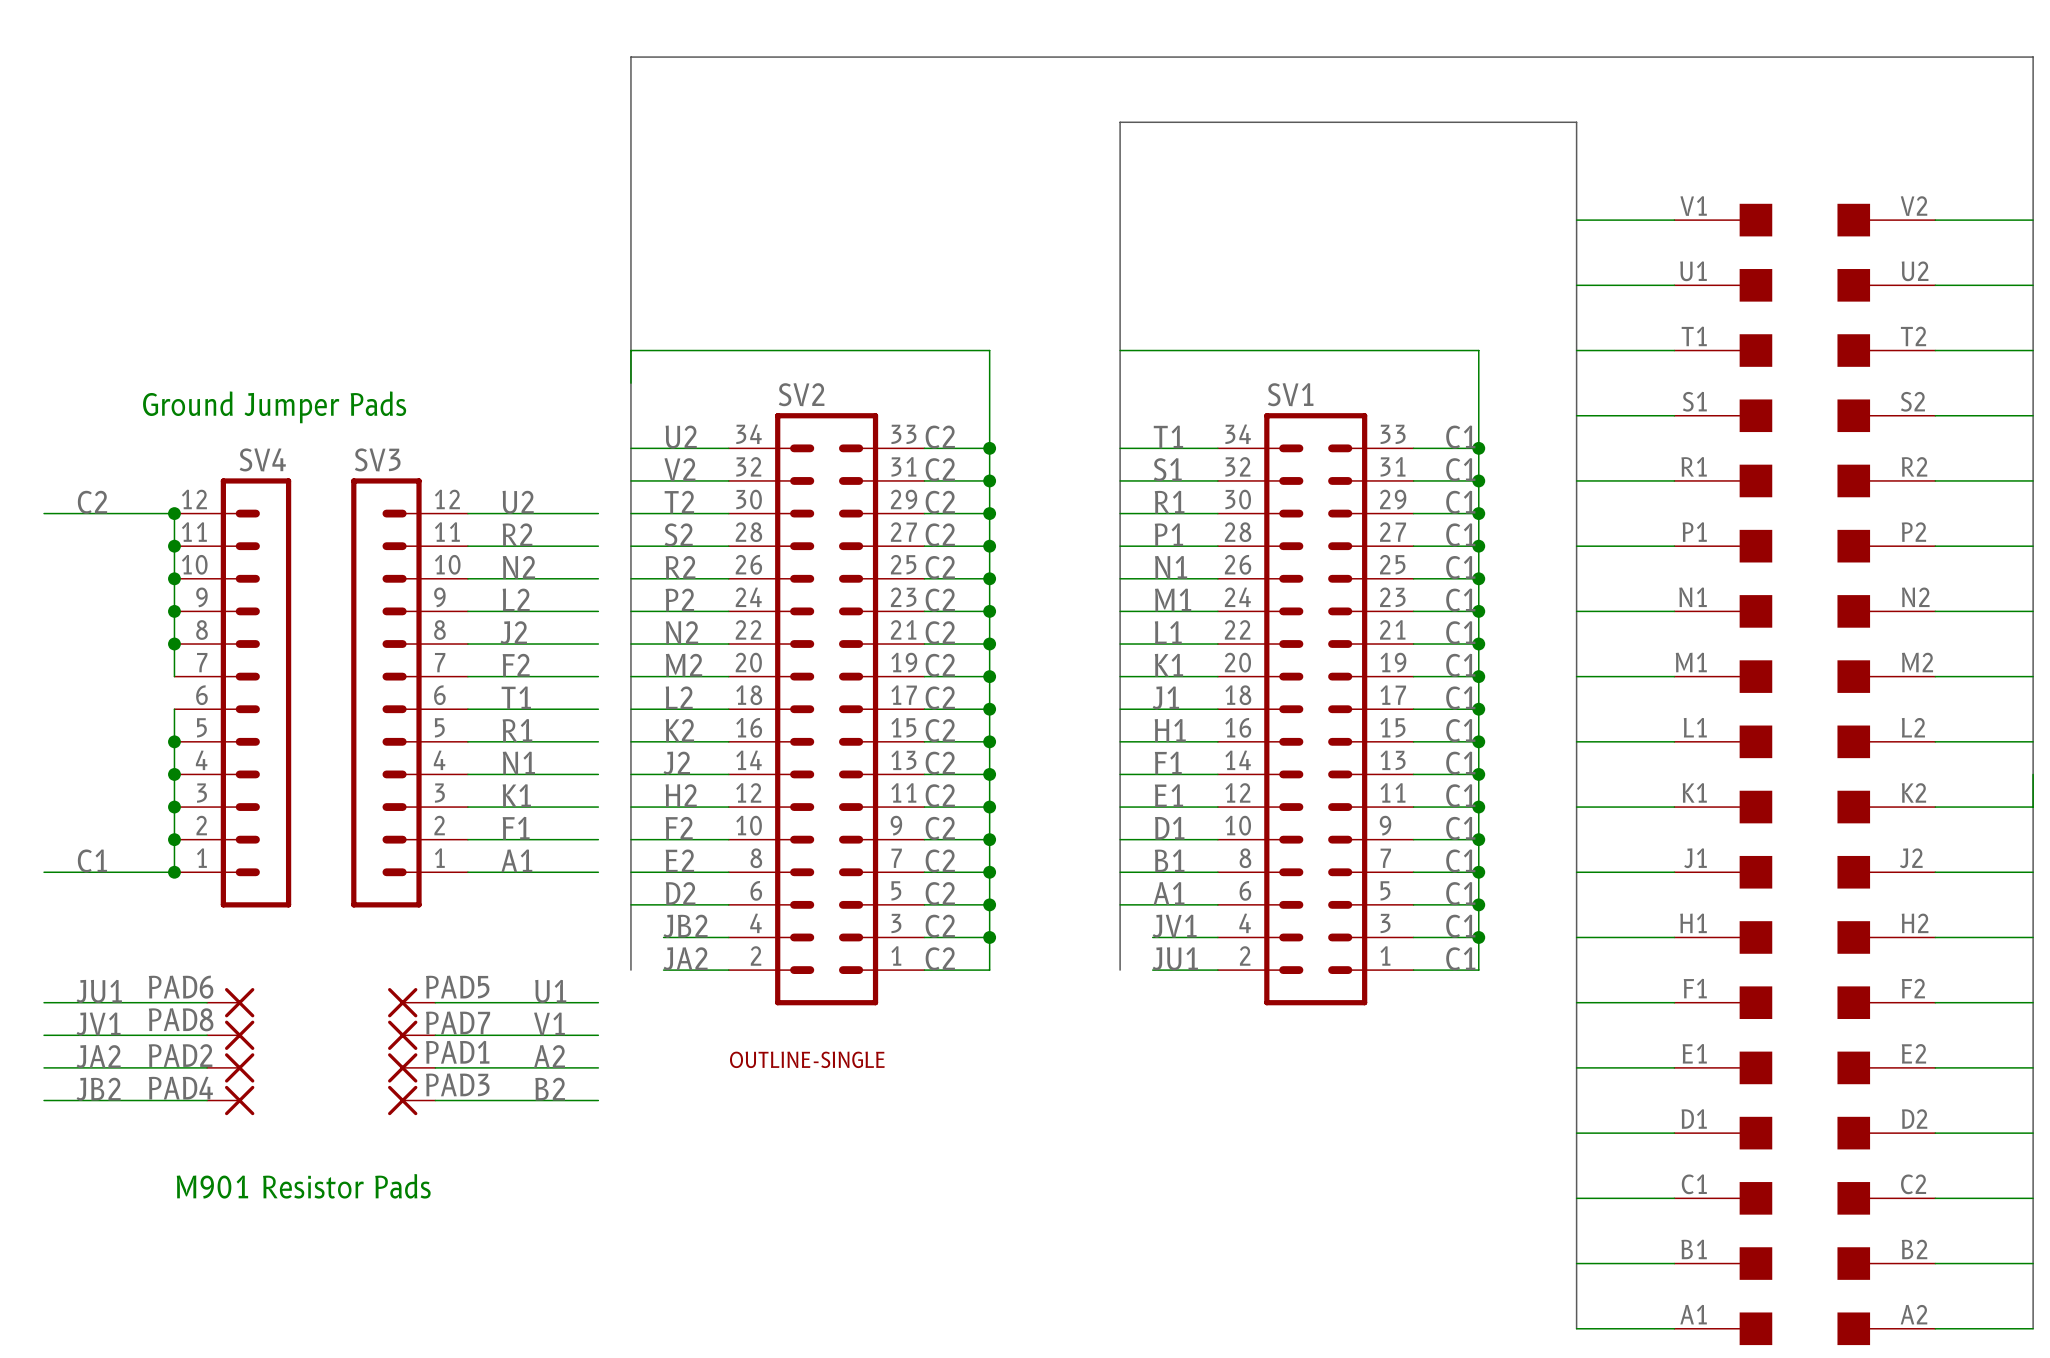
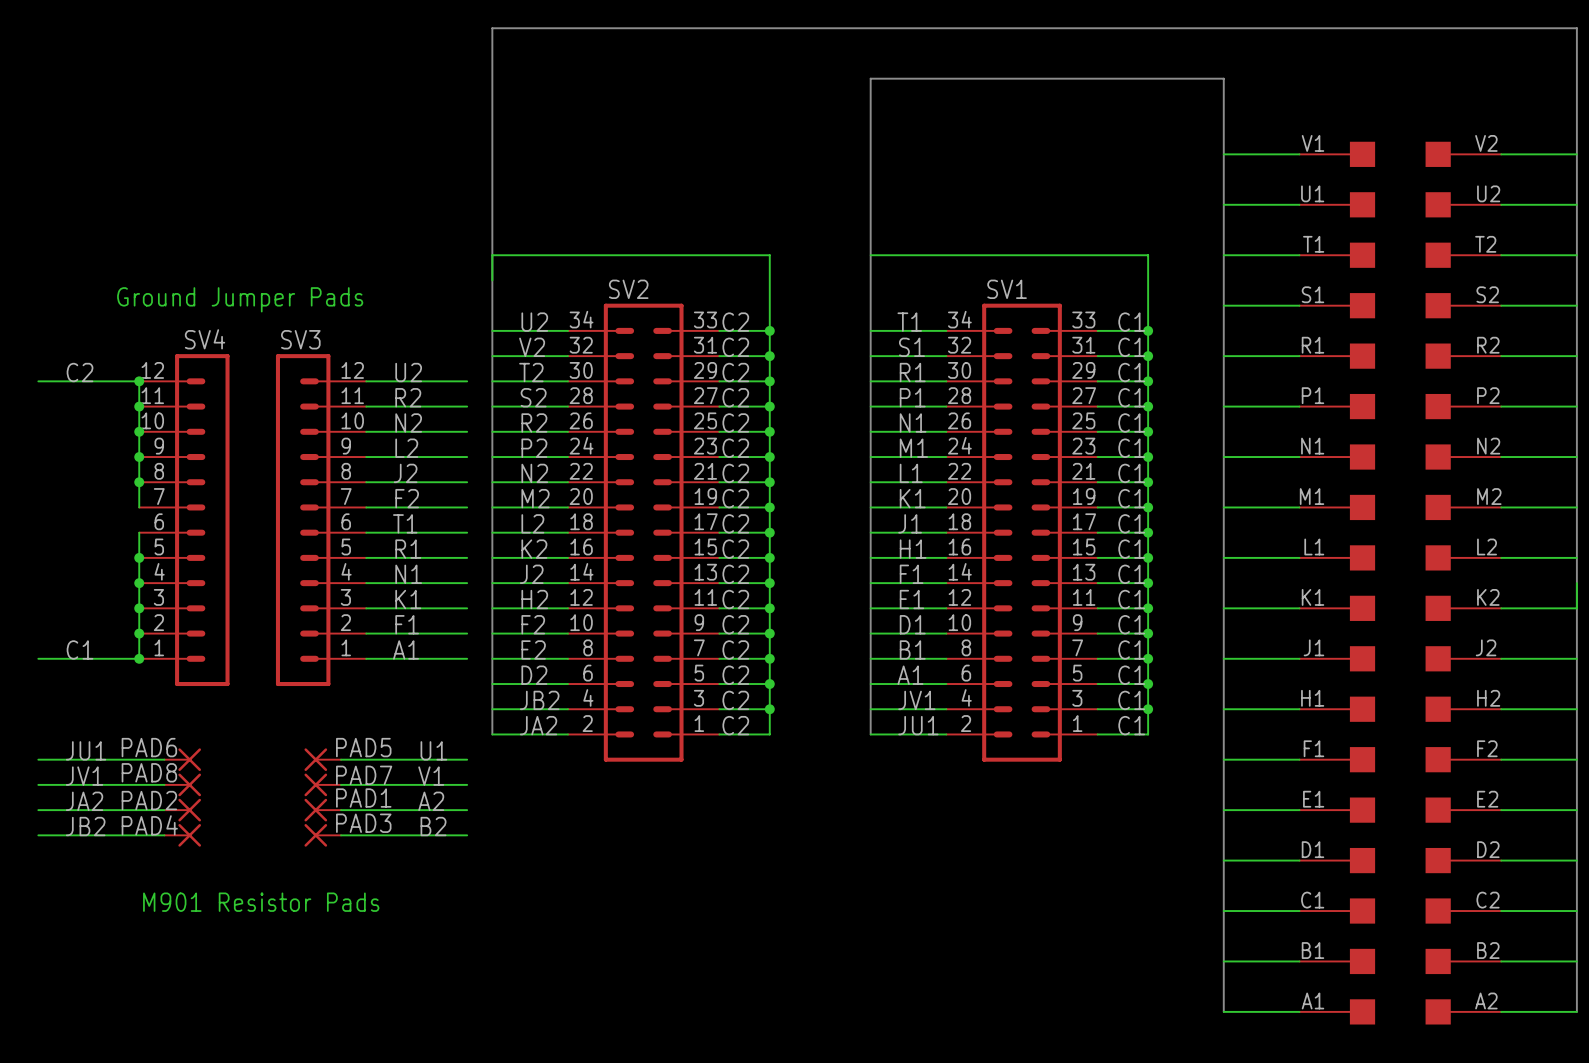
wire: none -> (492, 709) (517, 709)
wire: none -> (870, 709) (895, 709)
wire: none -> (492, 734) (517, 734)
wire: none -> (870, 734) (895, 734)
part: OUTLINE-SINGLE (807, 1059) -> none

